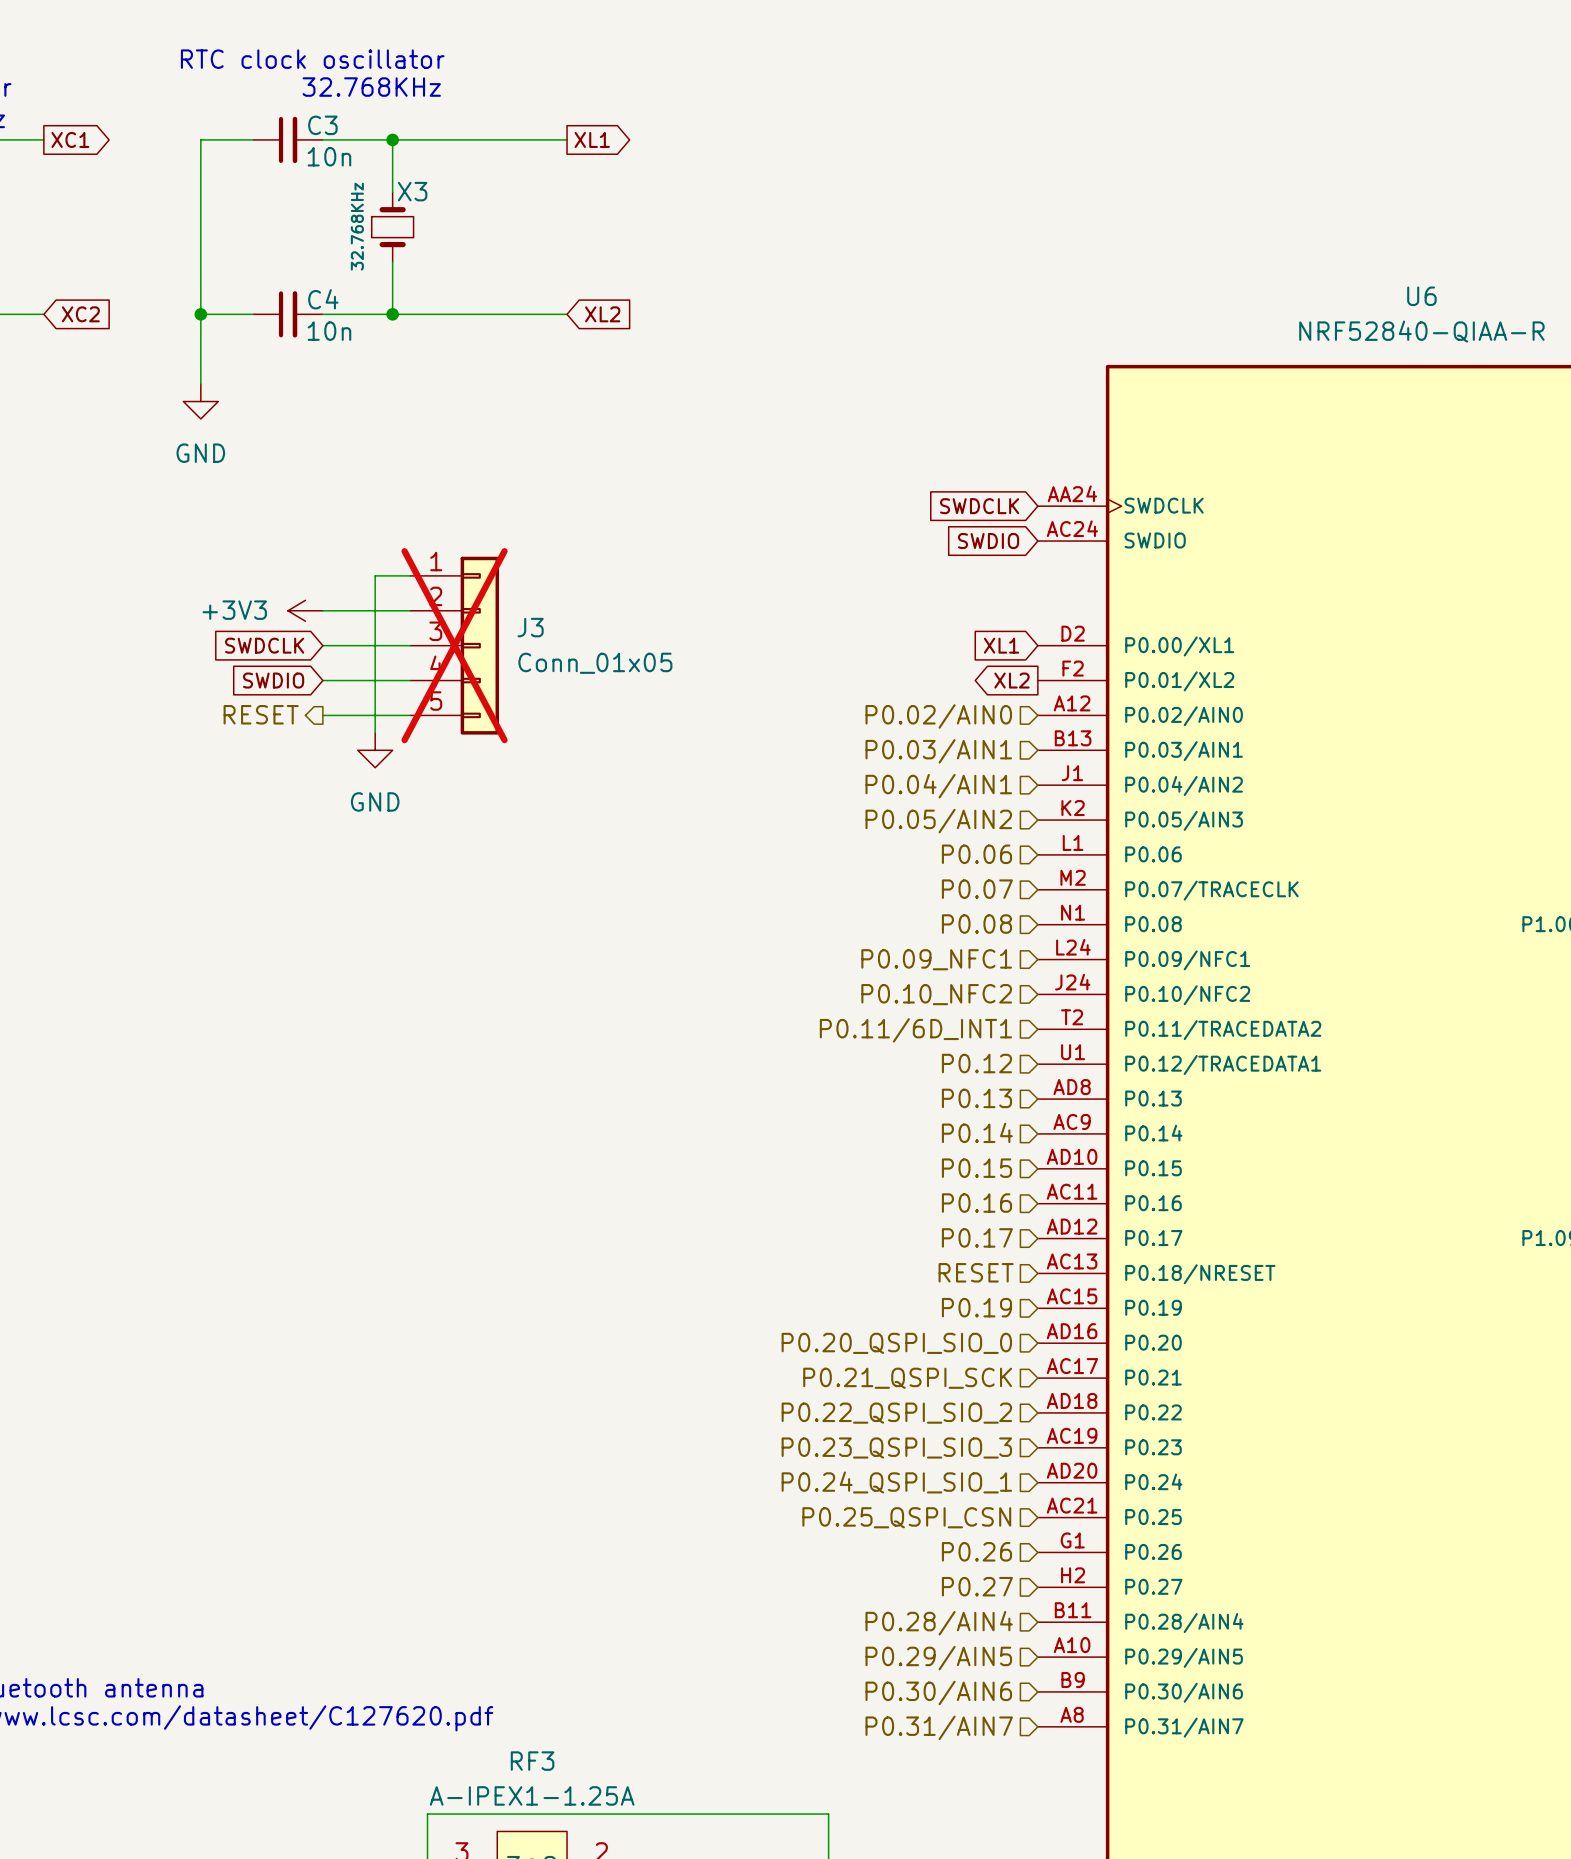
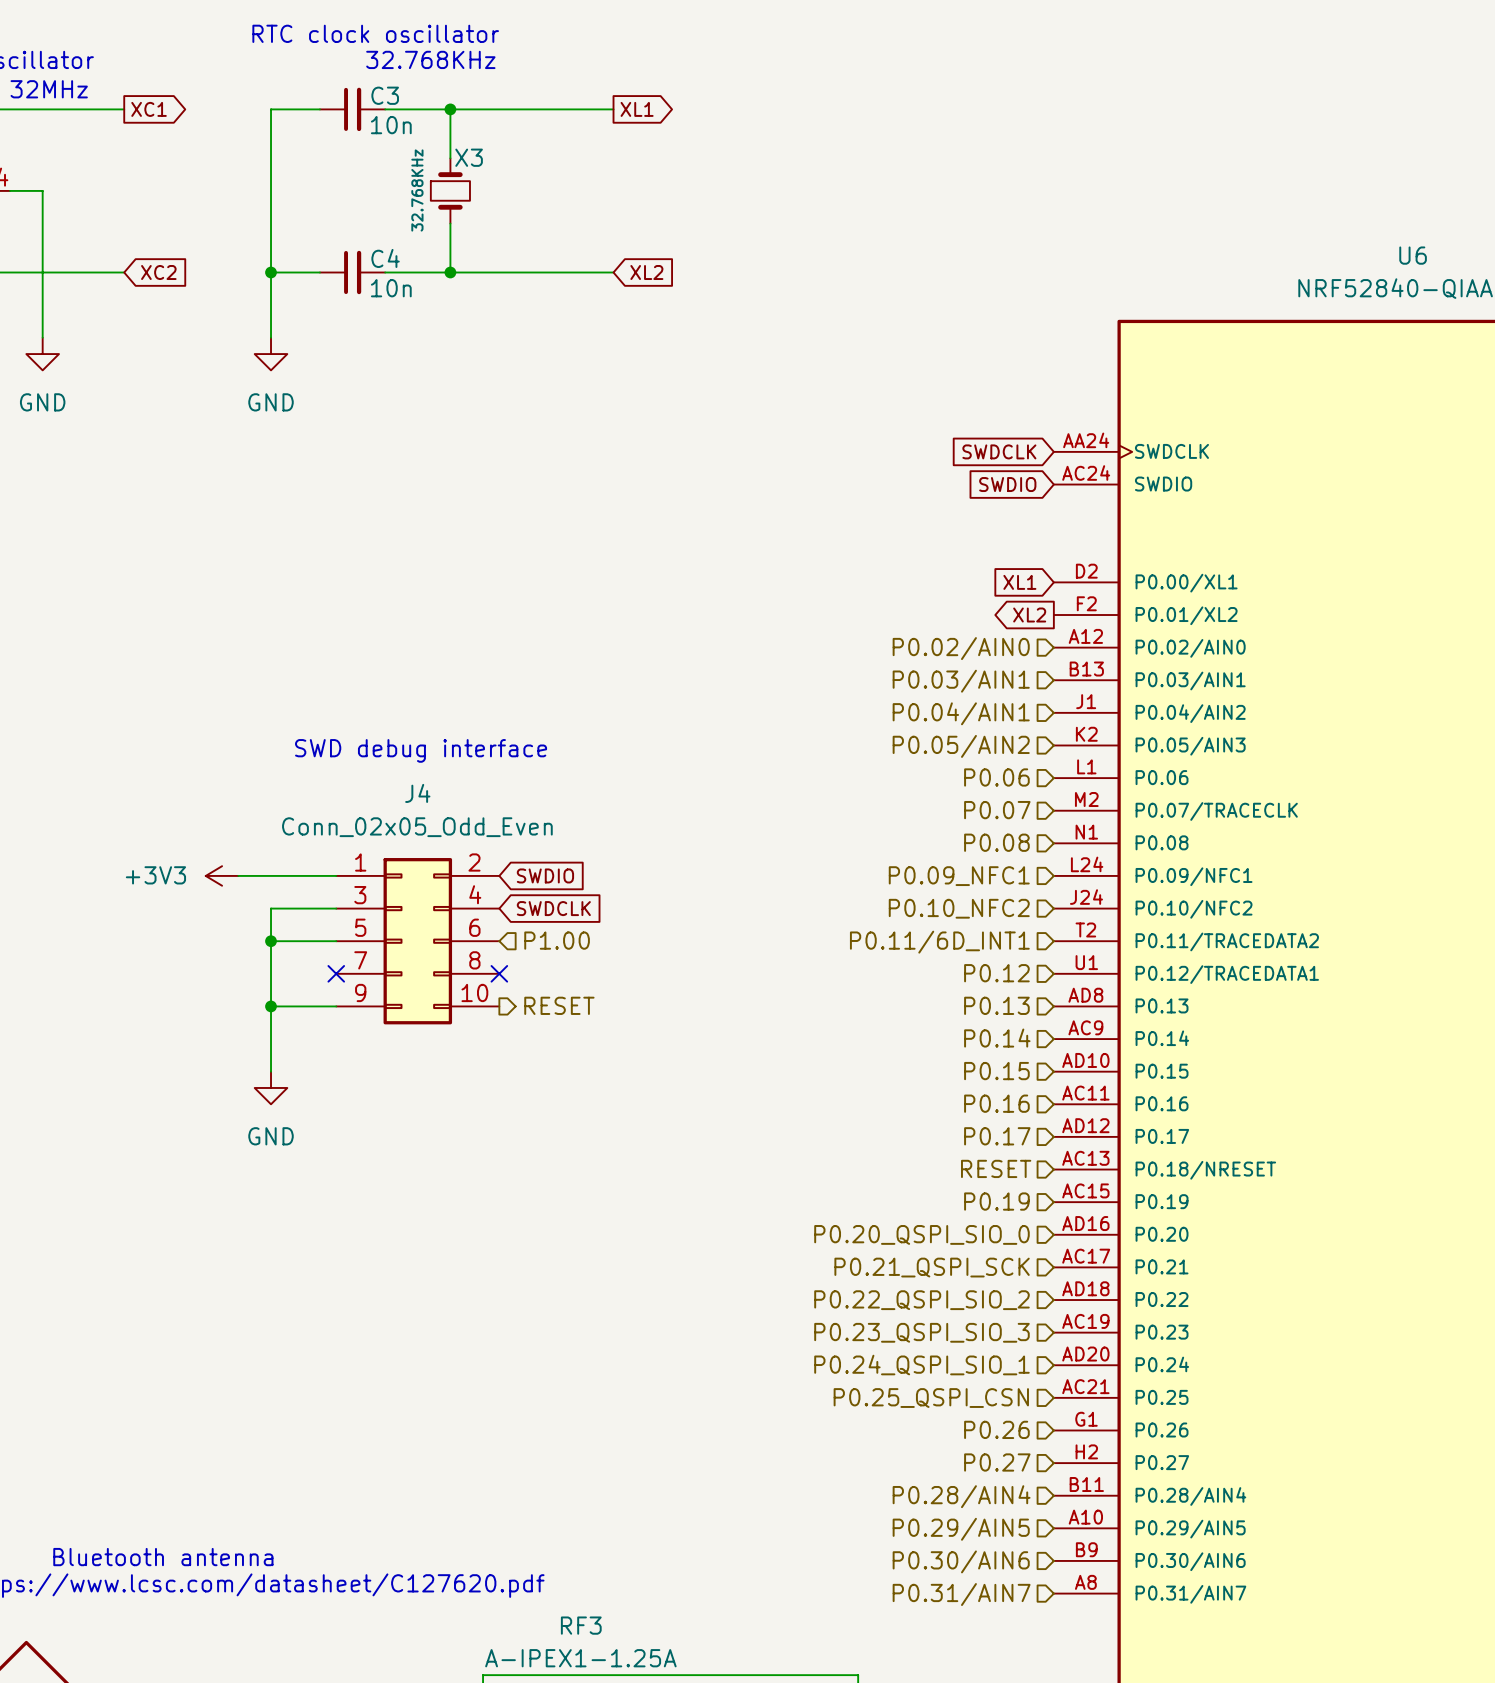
wire: (410, 575) (375, 575) (375, 732) -> none
power symbol: +3V3 (305, 610) -> none
wire: (322, 610) (410, 610) -> none
global label: SWDCLK (264, 645) -> none
wire: (322, 645) (410, 645) -> none
J3: Conn_01x05 (454, 645) -> none
global label rotation: 0° (273, 680) -> 180° (545, 875)
global label position: SWDIO (273, 680) -> SWDIO (545, 875)
wire: (322, 680) (410, 680) -> none
hierarchical label: RESET (261, 714) -> none
wire: (322, 715) (410, 715) -> none
power symbol: GND (375, 750) -> none
text: none -> SWD debug interface (421, 750)
power symbol: none -> +3V3 (222, 875)
wire: none -> (238, 875) (336, 875)
wire: none -> (336, 908) (271, 908) (271, 1071)
global label: none -> SWDCLK (553, 908)
hierarchical label: none -> P1.00 (557, 940)
wire: none -> (271, 941) (336, 941)
junction: none -> (271, 941)
J4: none -> Conn_02x05_Odd_Even (417, 941)
no-connect mark: none -> (336, 973)
no-connect mark: none -> (499, 973)
hierarchical label: none -> RESET (559, 1005)
wire: none -> (271, 1006) (336, 1006)
junction: none -> (271, 1006)
power symbol: none -> GND (271, 1087)

